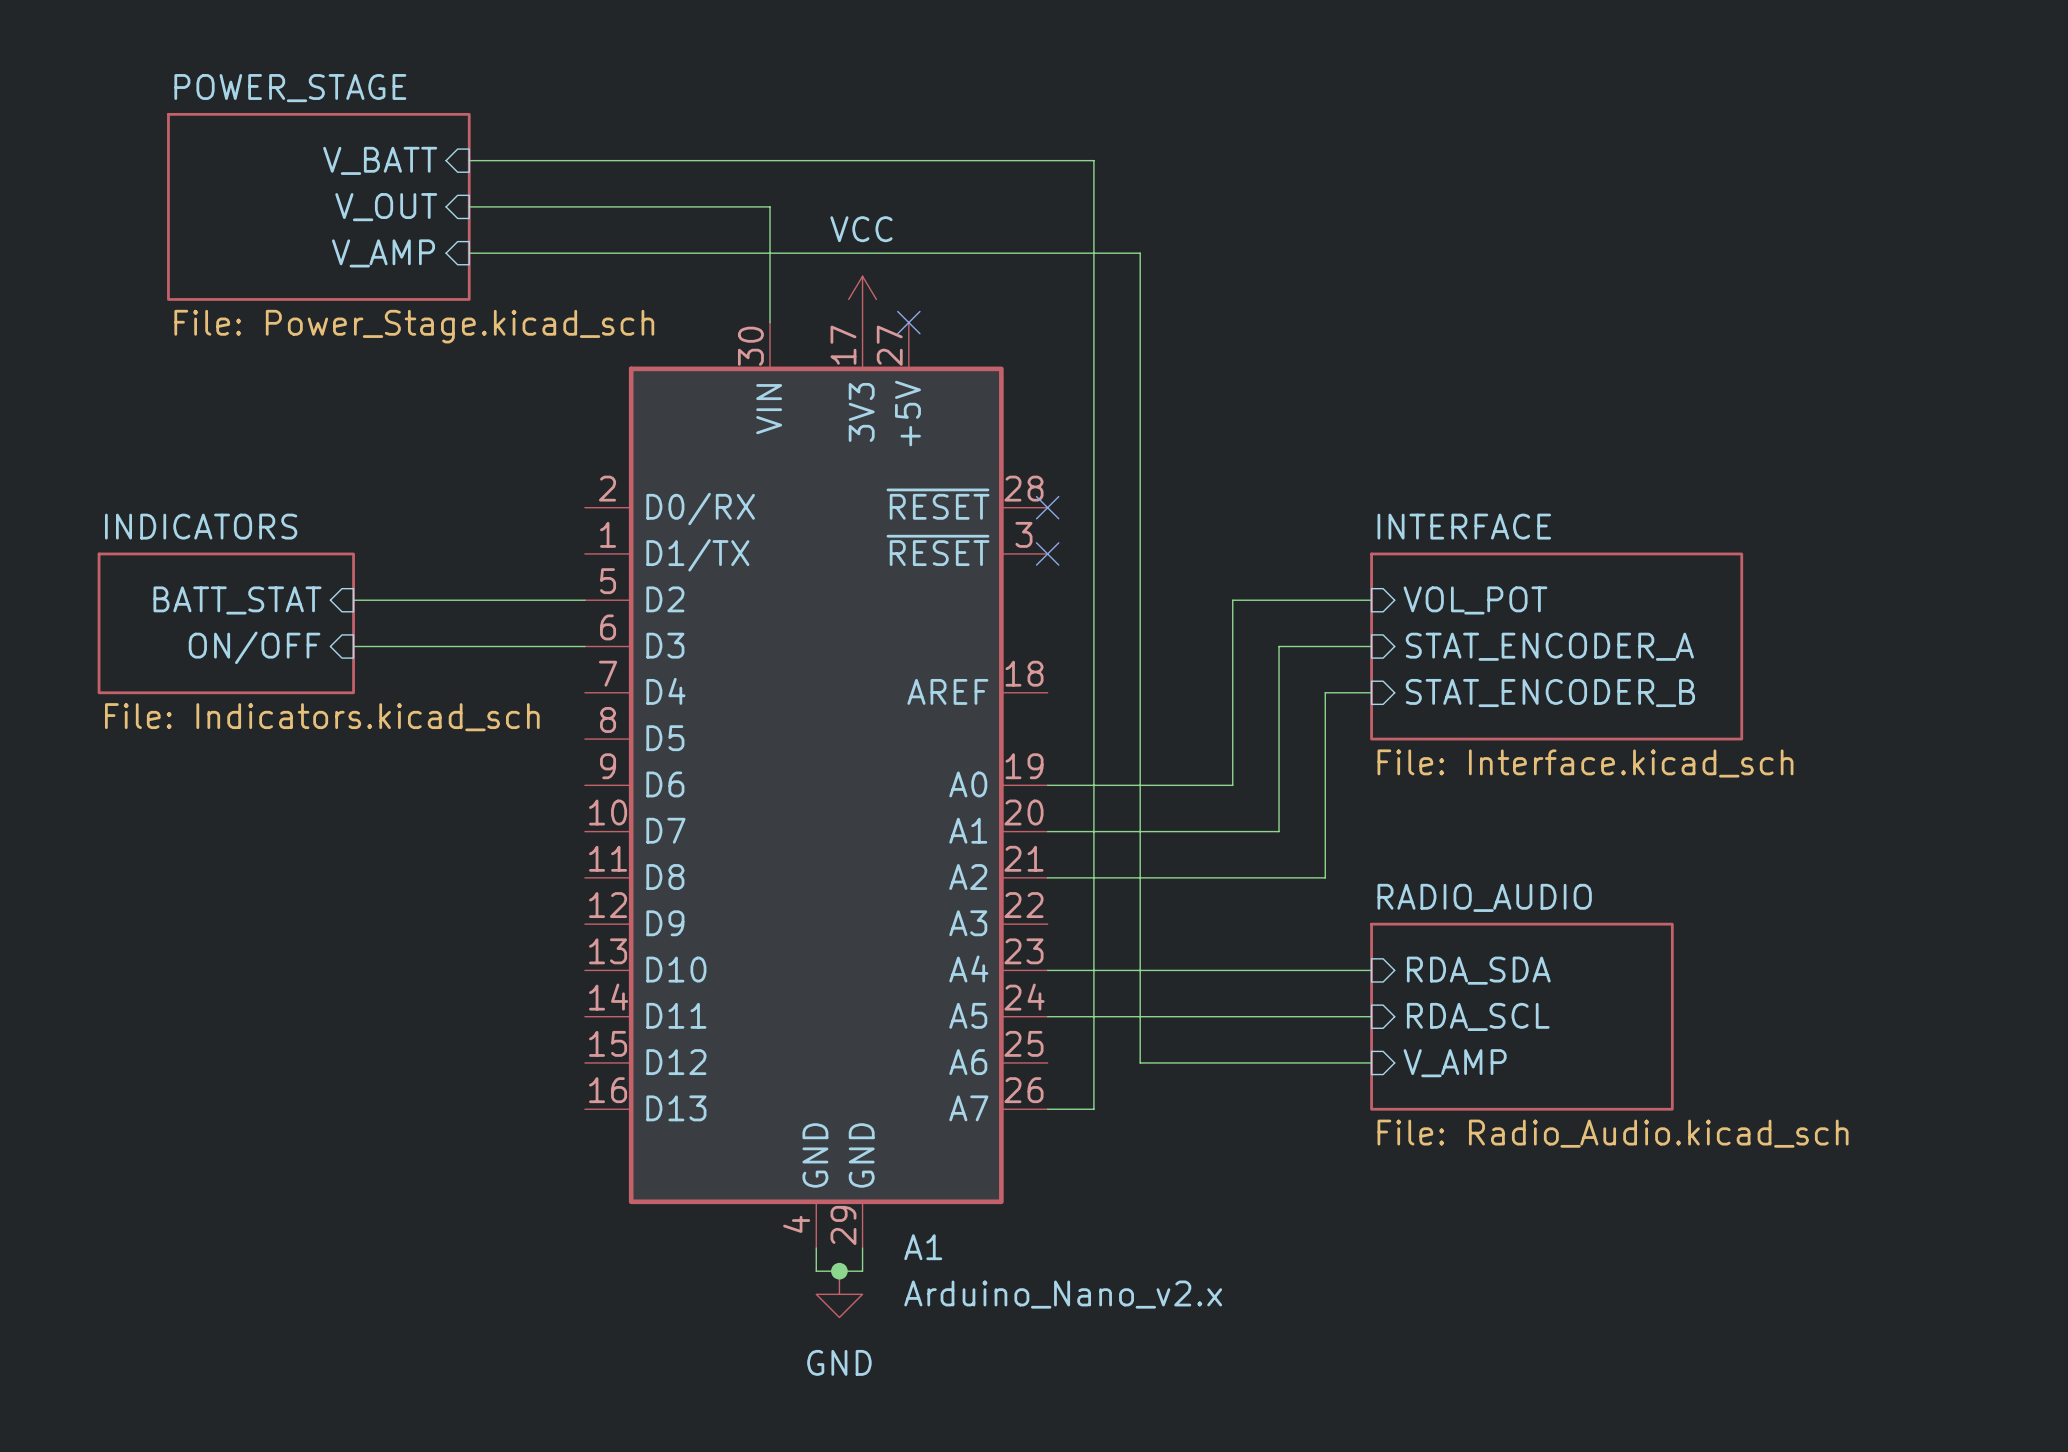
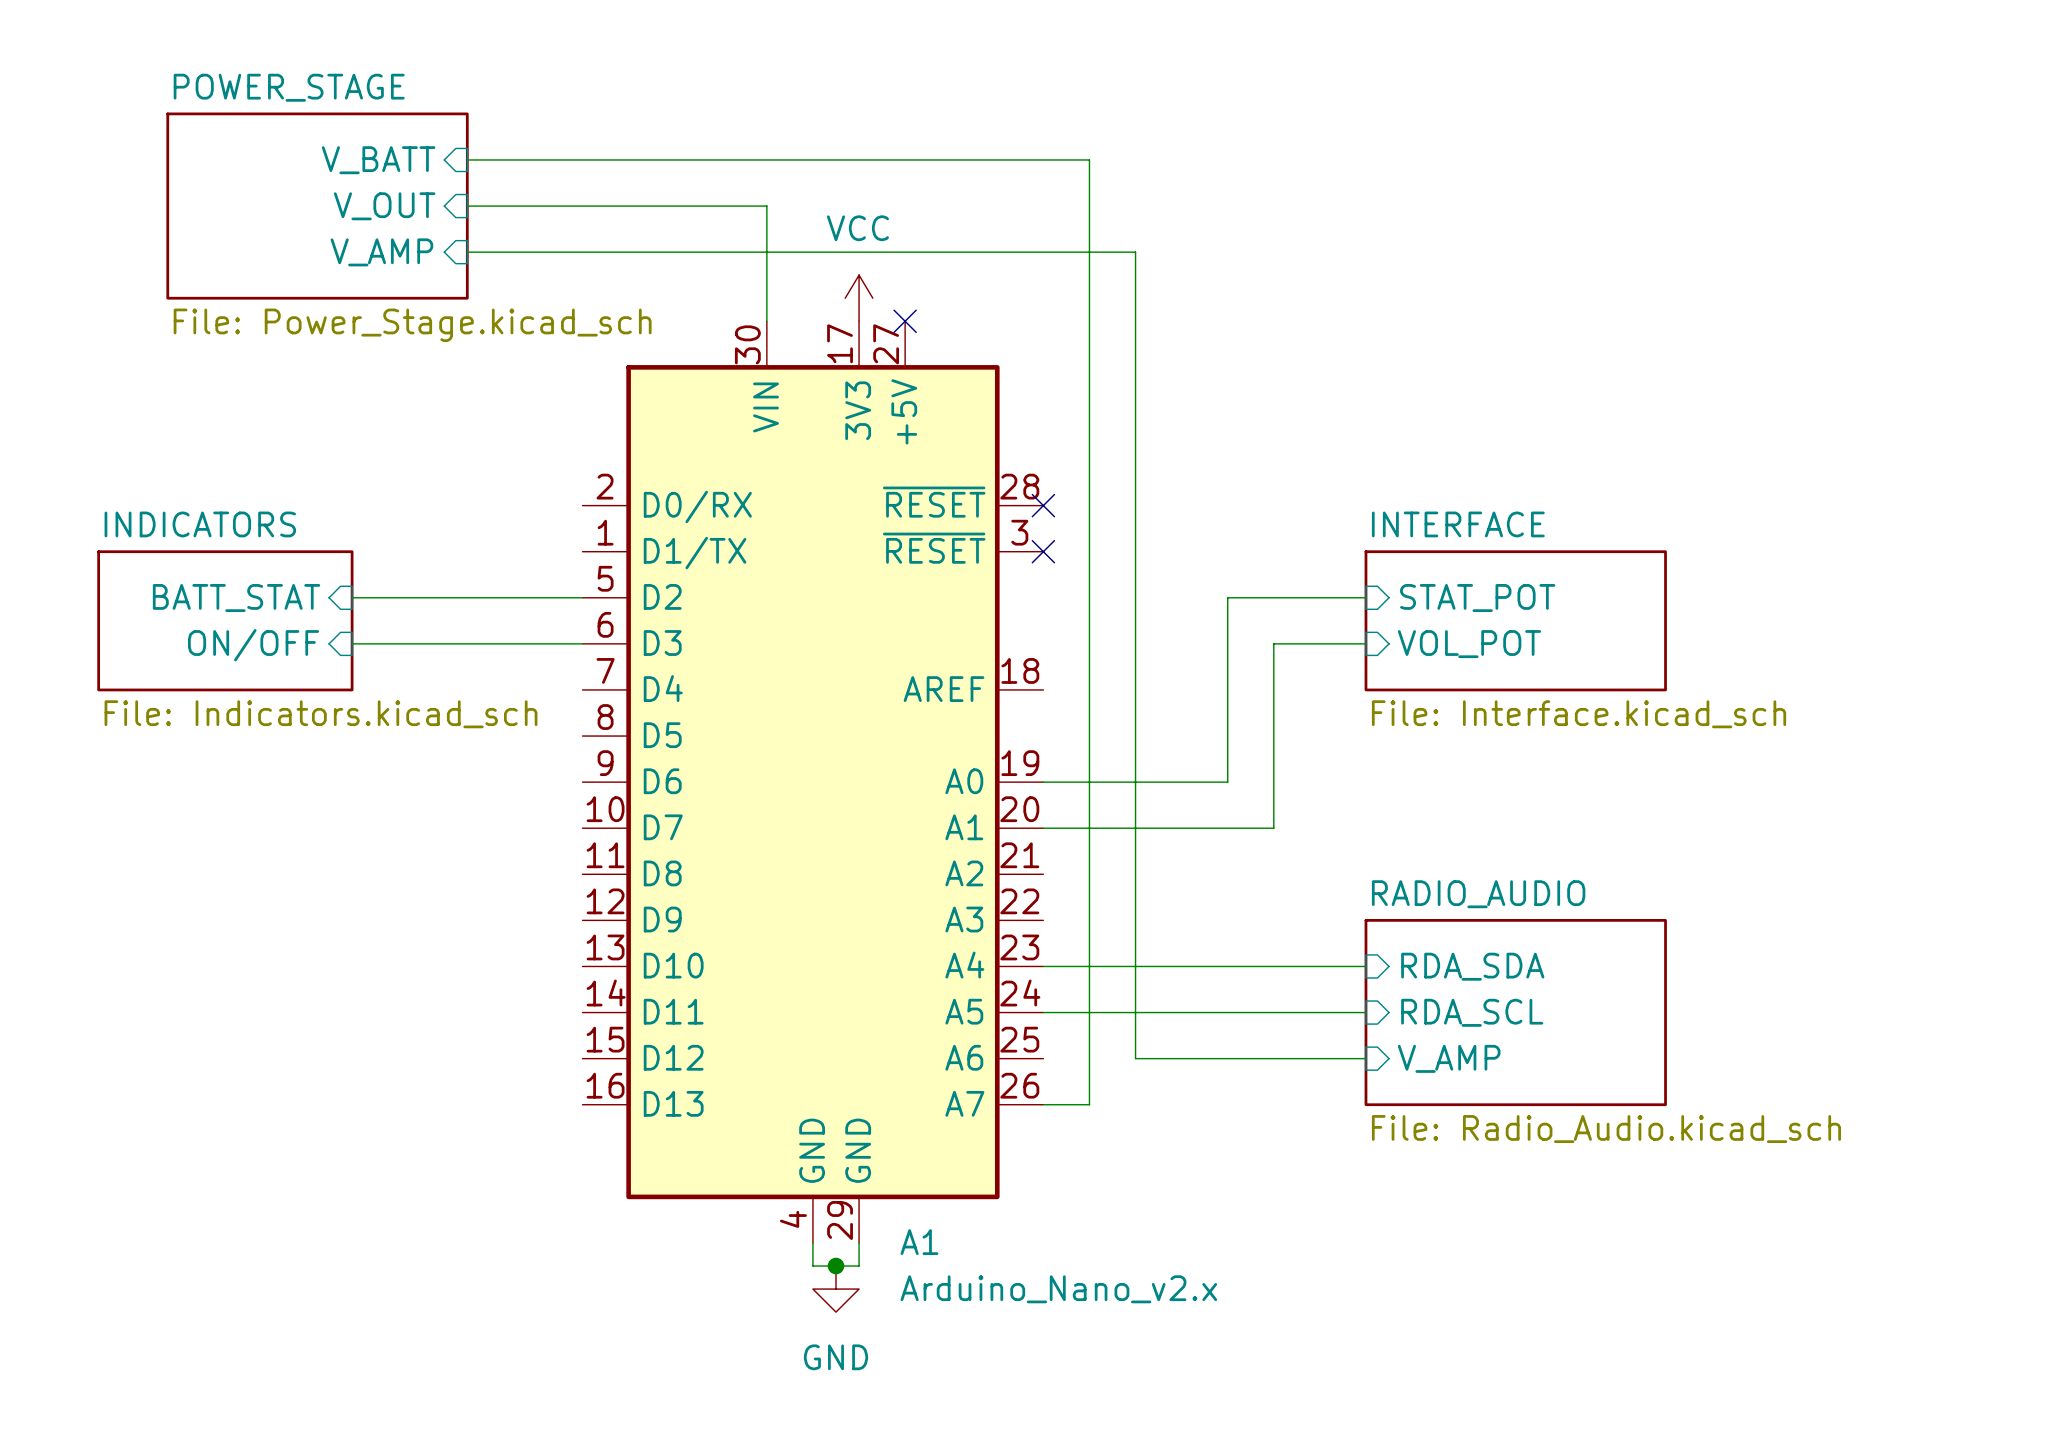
sheet pin: VOL_POT (1475, 600) -> STAT_POT (1477, 598)
sheet INTERFACE: none -> File: Interface.kicad_sch (1515, 620)
sheet pin: STAT_ENCODER_A (1549, 646) -> VOL_POT (1469, 644)
sheet INTERFACE: File: Interface.kicad_sch (1556, 646) -> none
wire: (1371, 692) (1325, 692) (1325, 877) (1047, 877) -> none
sheet pin: STAT_ENCODER_B (1550, 693) -> none

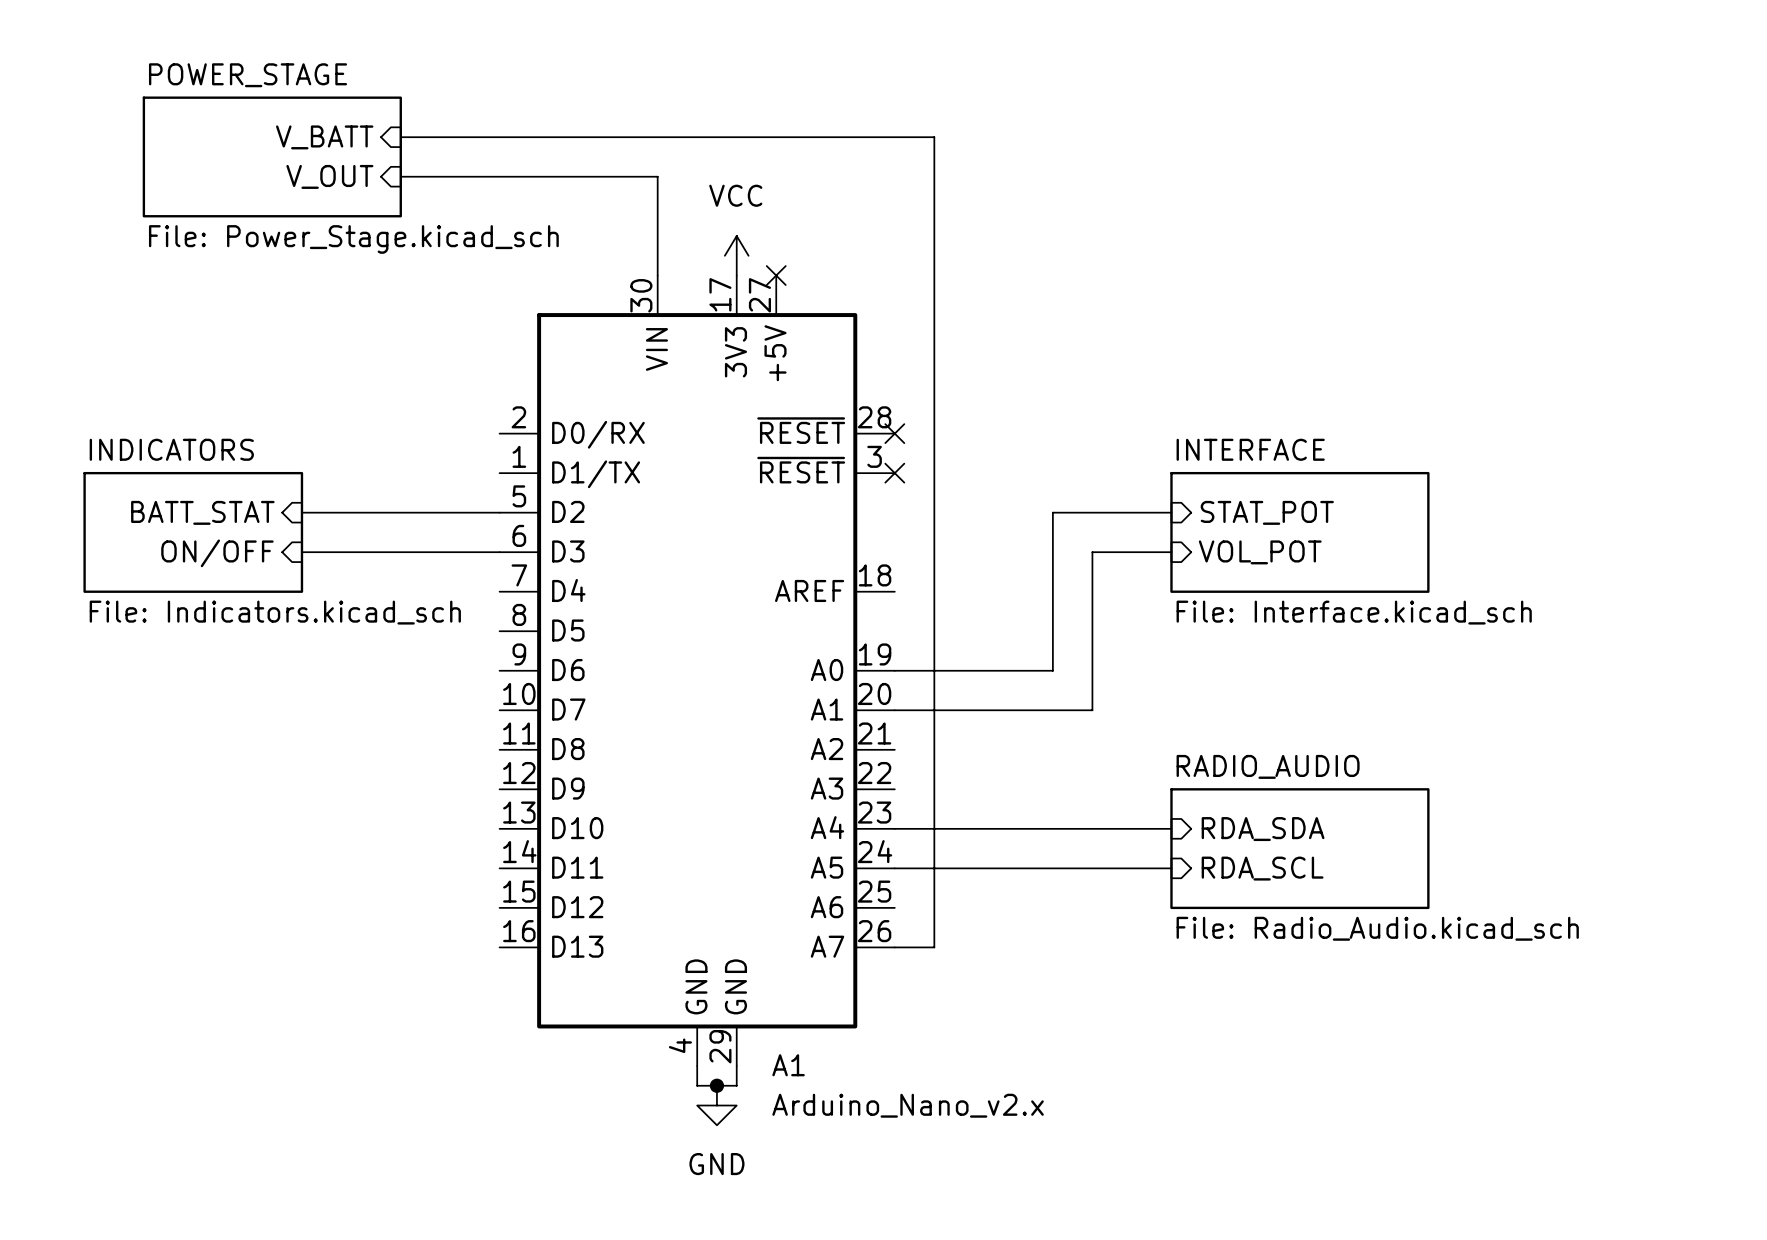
sheet POWER_STAGE: none -> File: Power_Stage.kicad_sch (272, 156)
sheet POWER_STAGE: File: Power_Stage.kicad_sch (317, 206) -> none
sheet pin: V_AMP (381, 252) -> none
wire: (467, 252) (1135, 252) (1135, 1058) (1365, 1058) -> none
sheet RADIO_AUDIO: none -> File: Radio_Audio.kicad_sch (1299, 848)
sheet RADIO_AUDIO: File: Radio_Audio.kicad_sch (1515, 1012) -> none
sheet pin: V_AMP (1449, 1058) -> none

